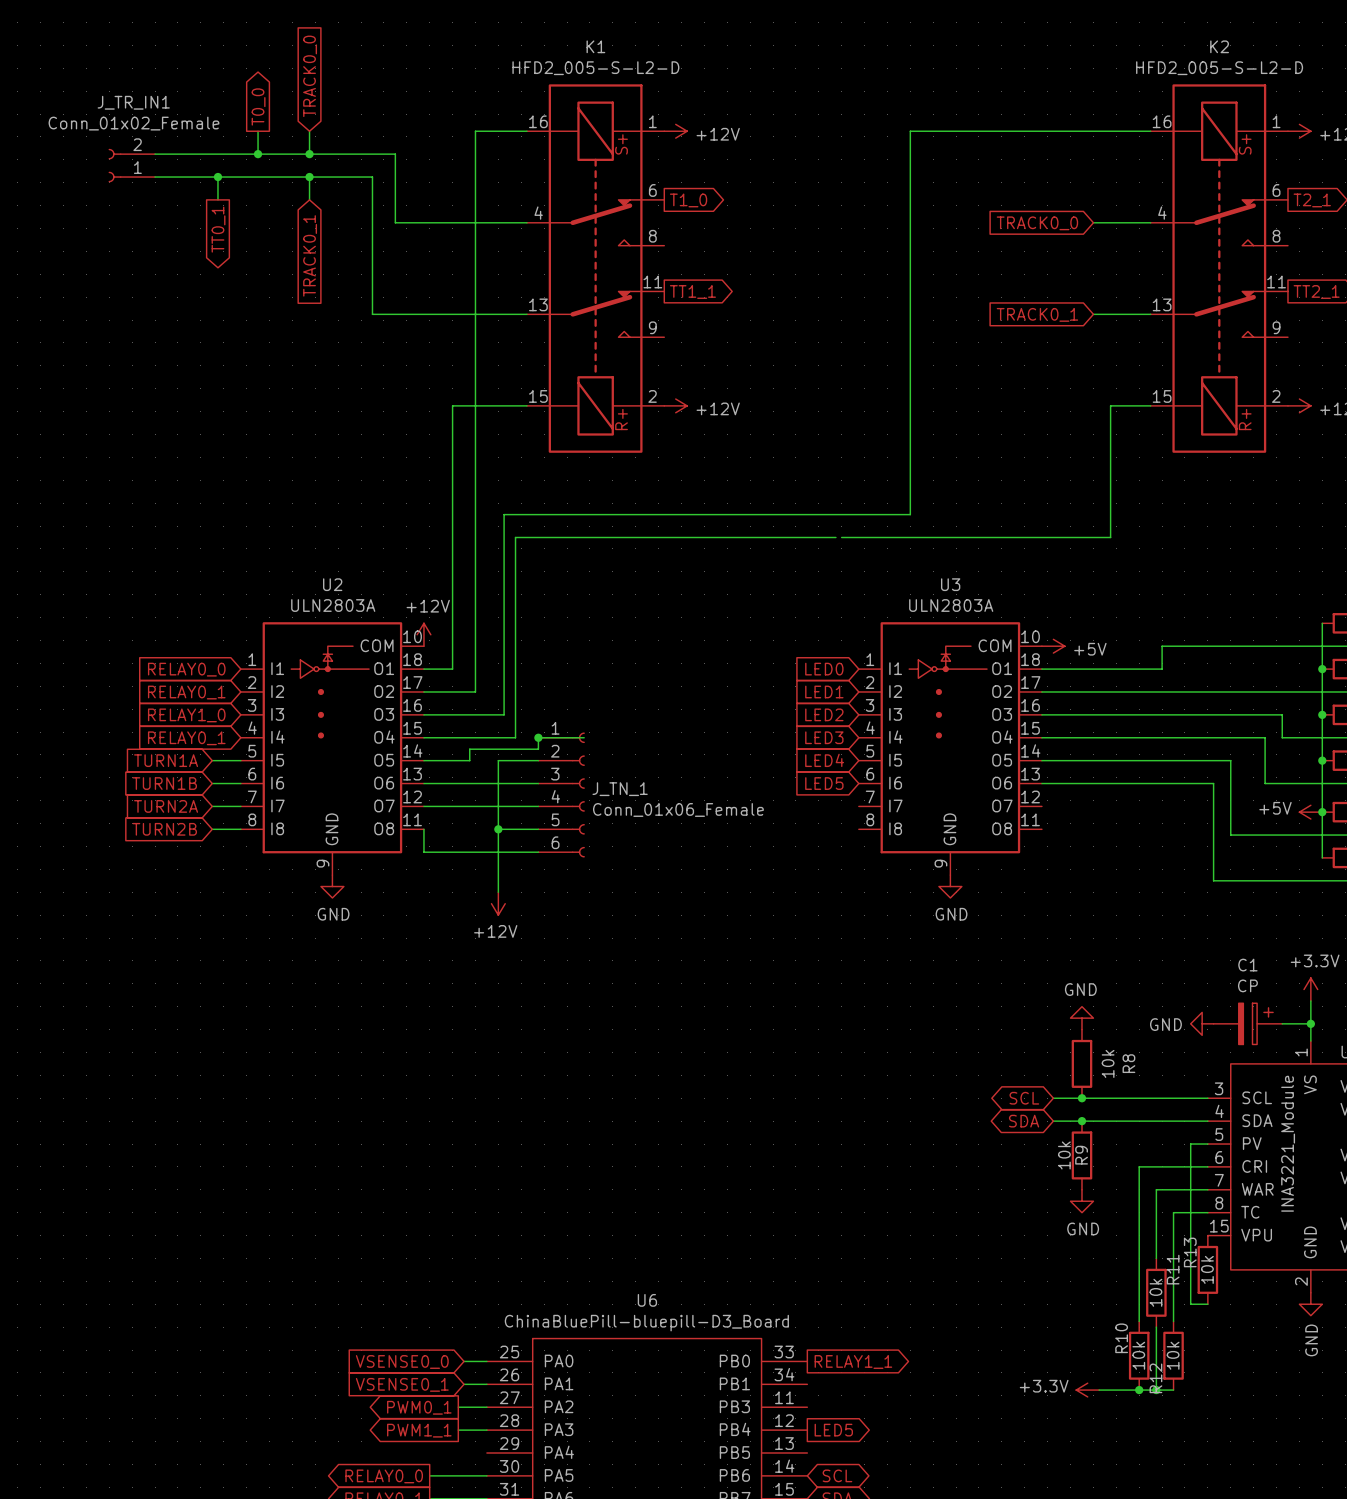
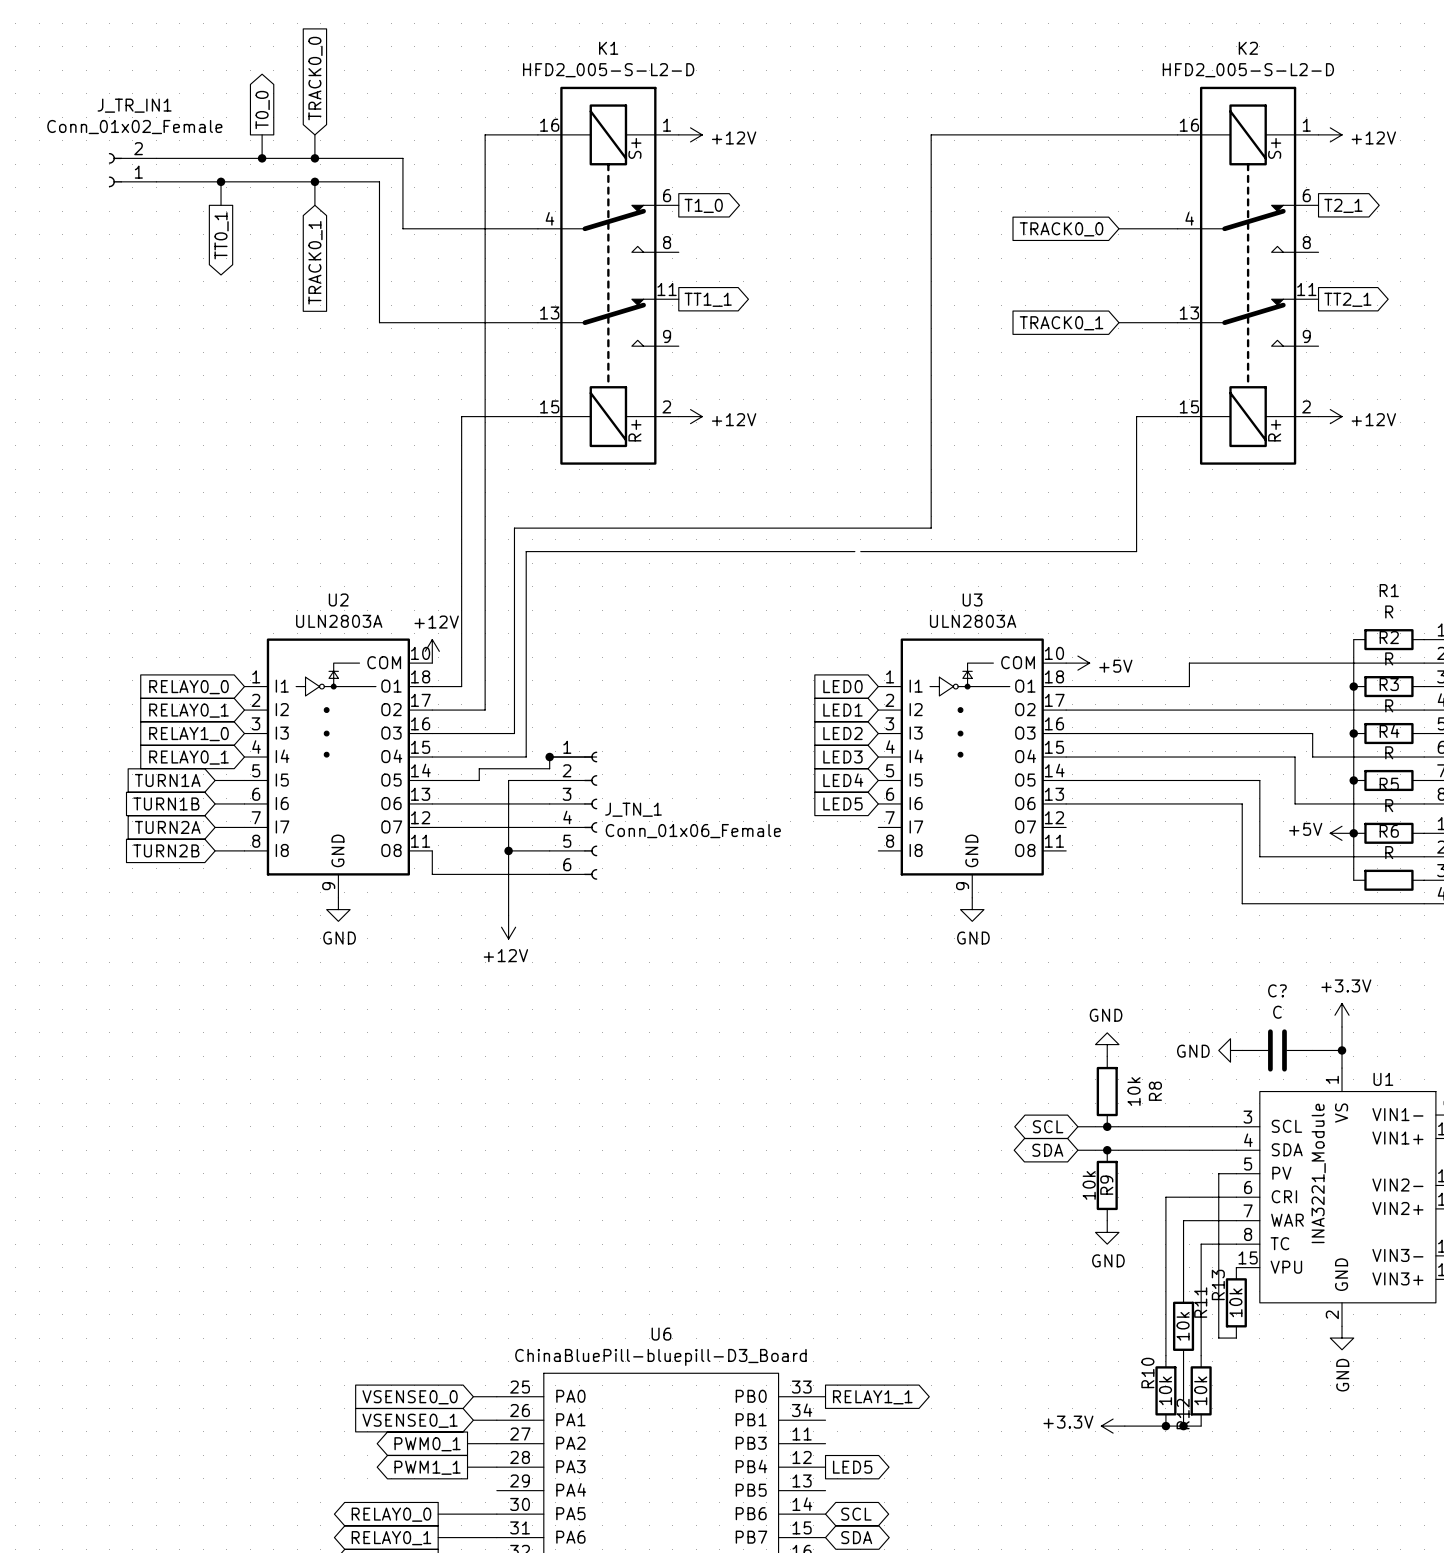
C1: CP (1247, 1023) -> none
C?: none -> C (1277, 1050)

